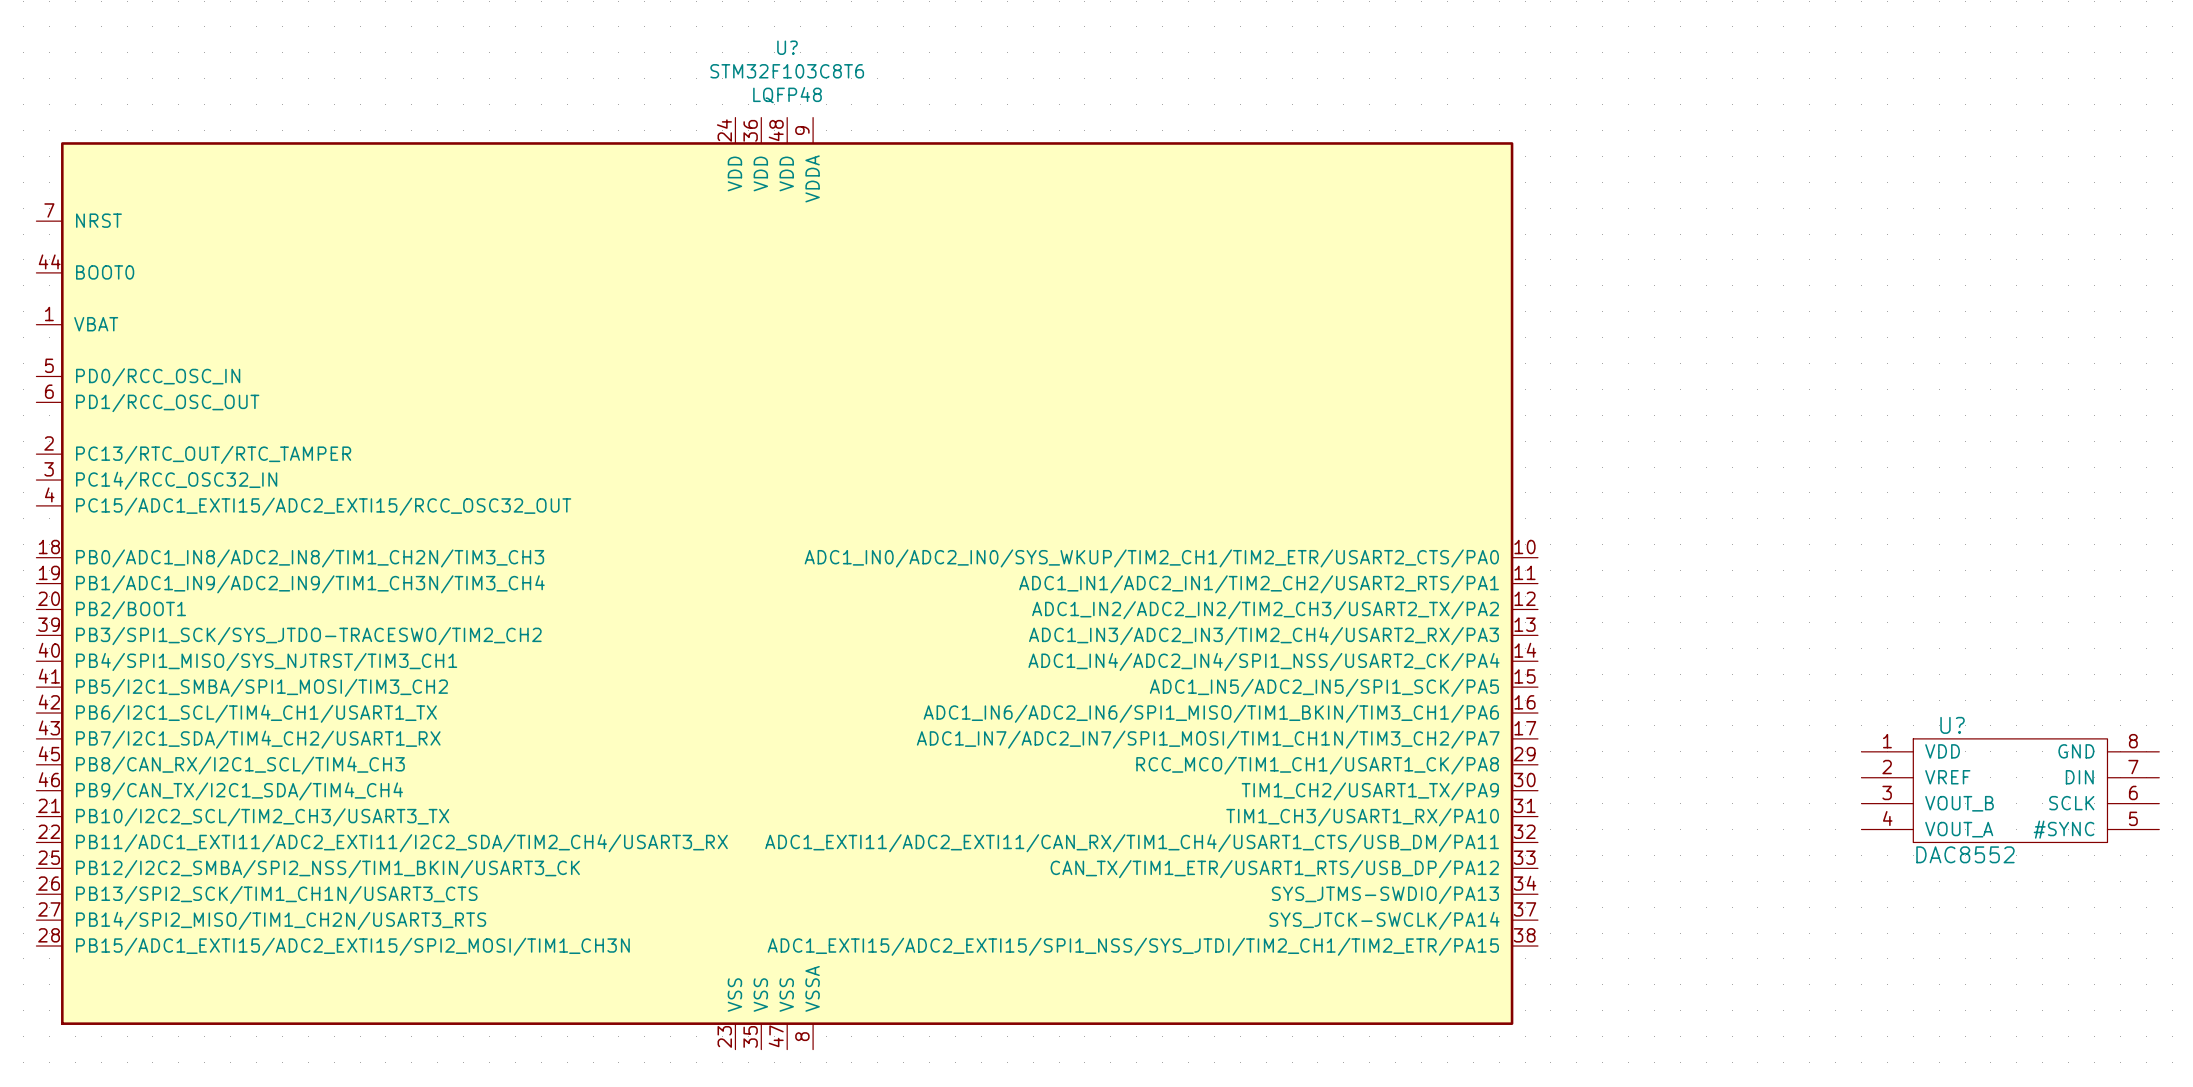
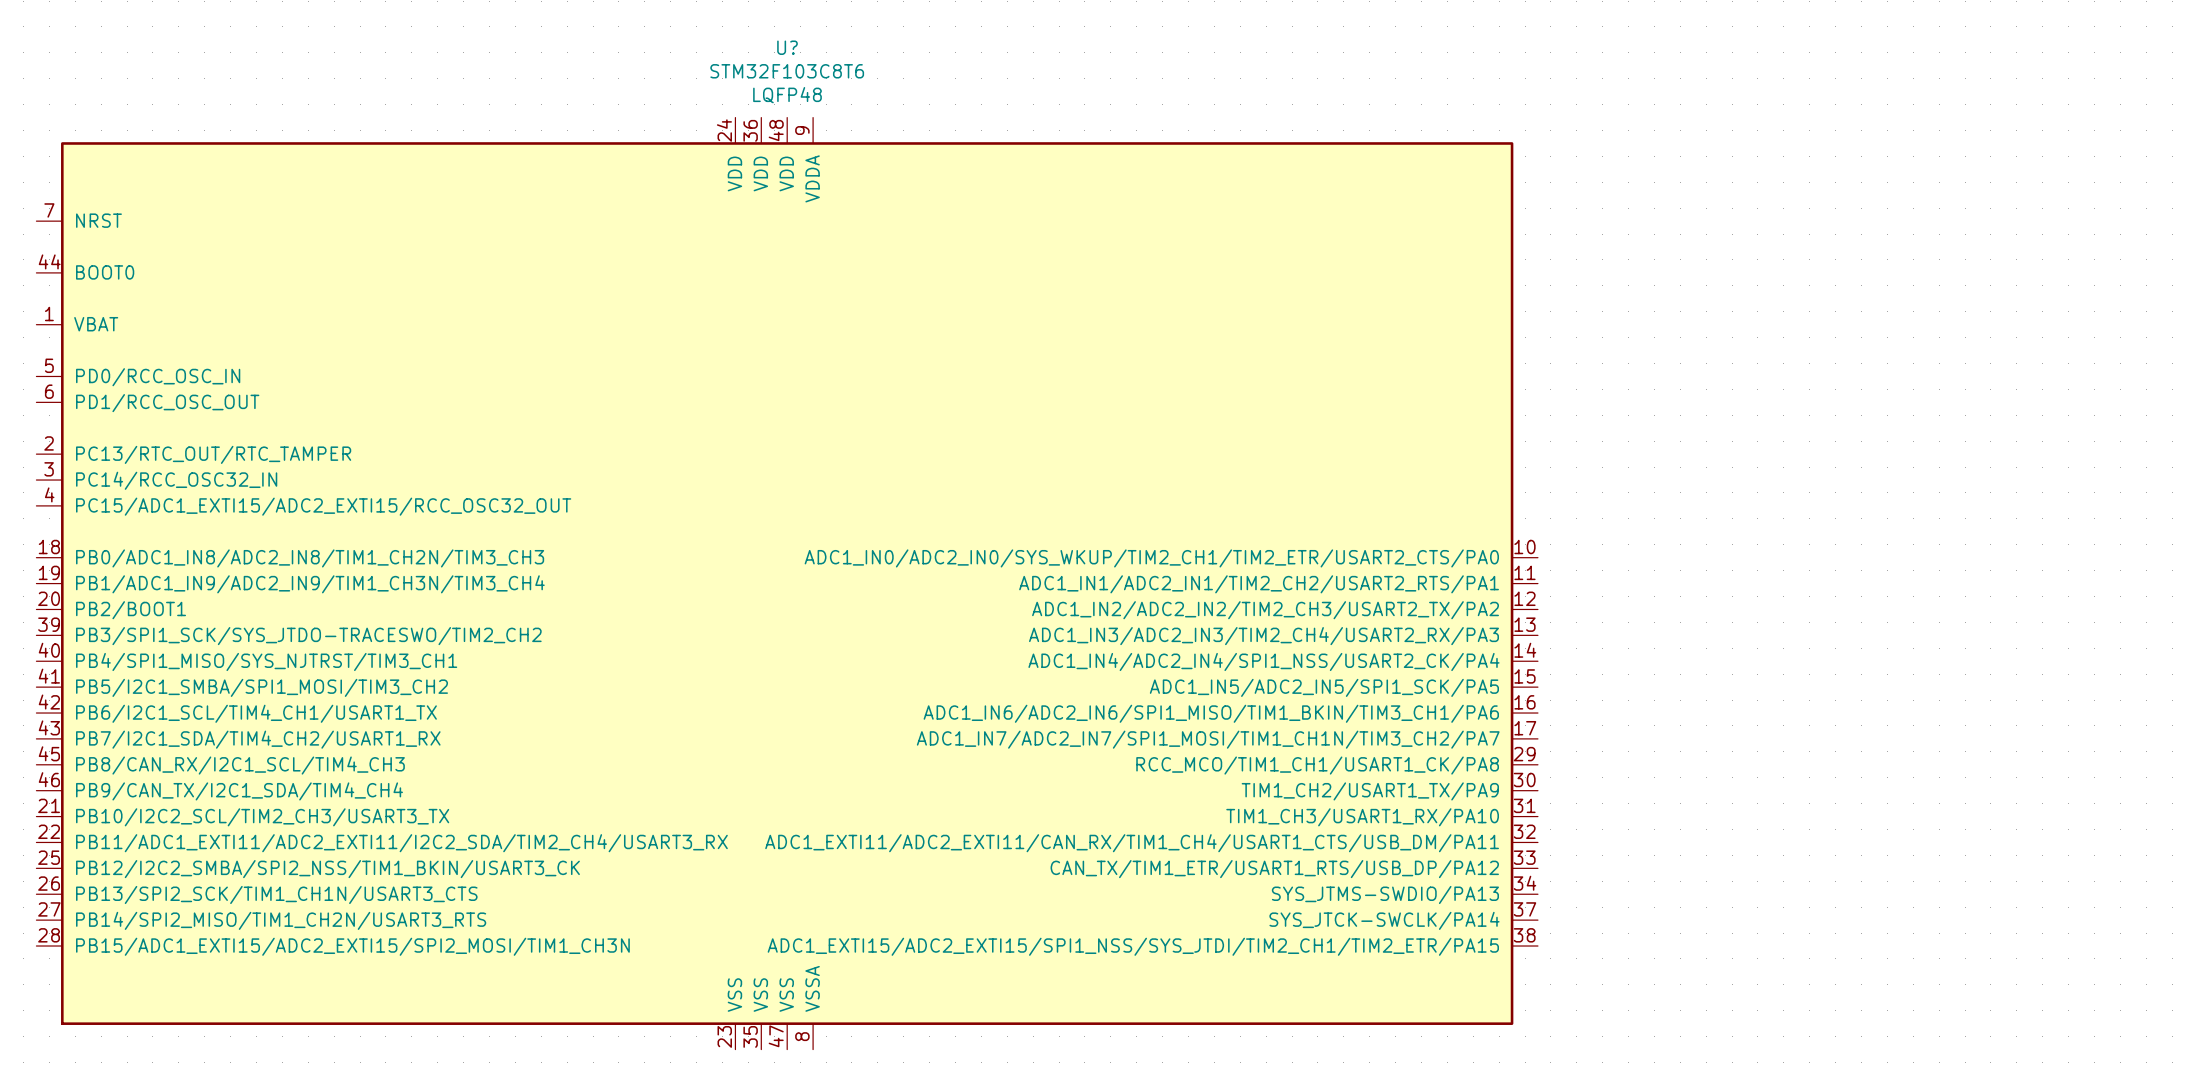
U?: DAC8552 (2010, 790) -> none

